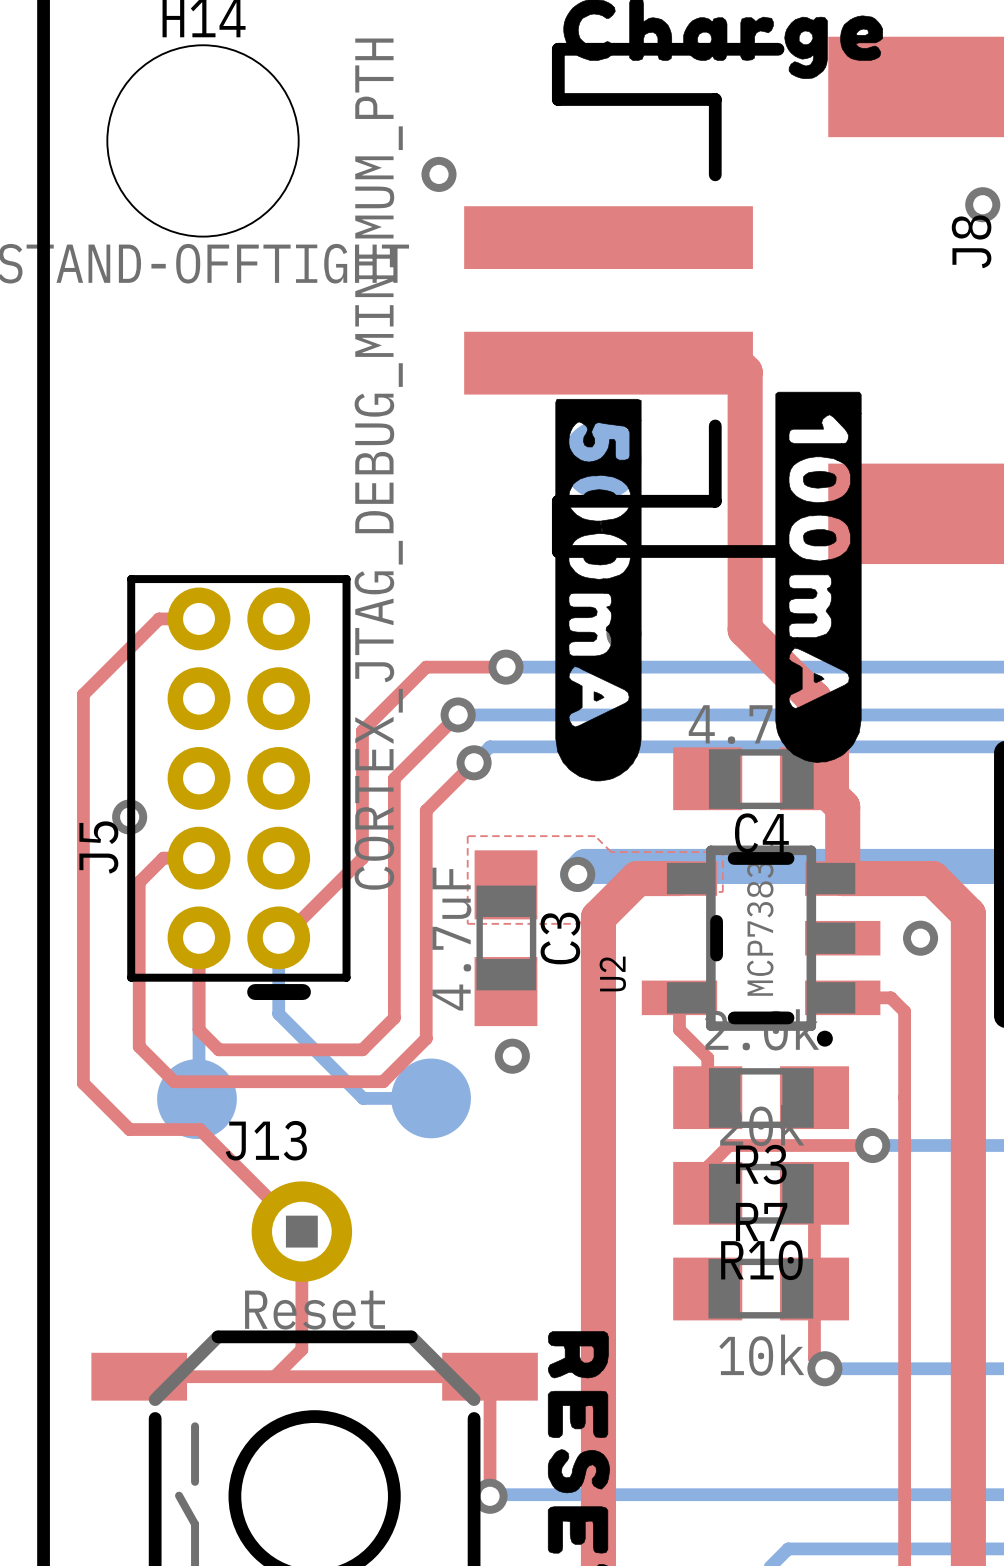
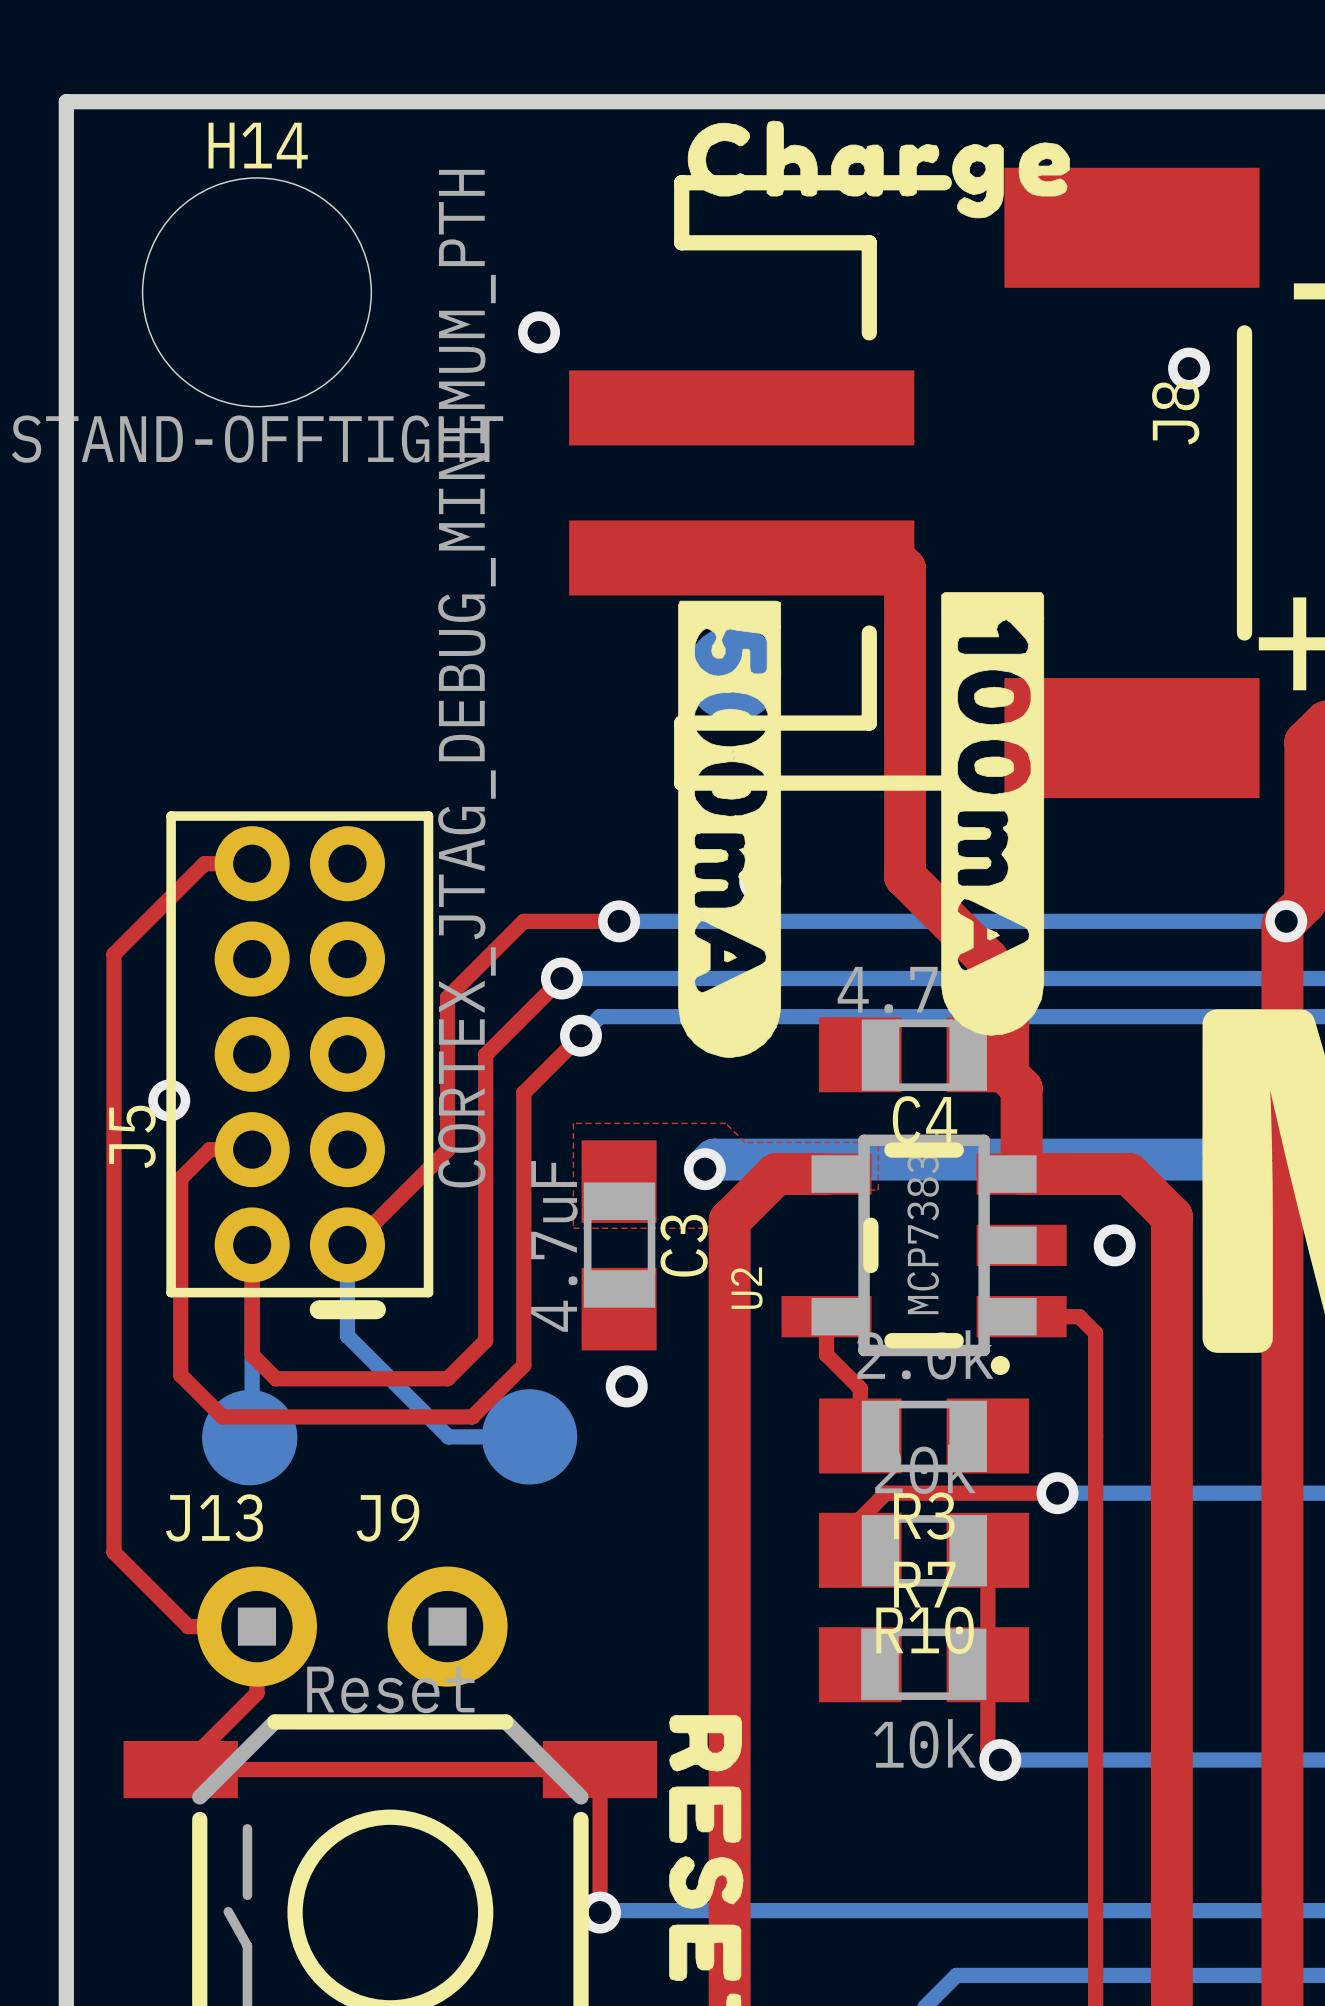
top track: (83, 1083) (129, 1129) (199, 1129) (301, 1231) (301, 1349) (274, 1376) -> (113, 1418) (113, 1552) (188, 1626) (256, 1626) (256, 1693) (180, 1769)
J13 position: (301, 1231) -> (256, 1626)
J9: none -> (447, 1626)

